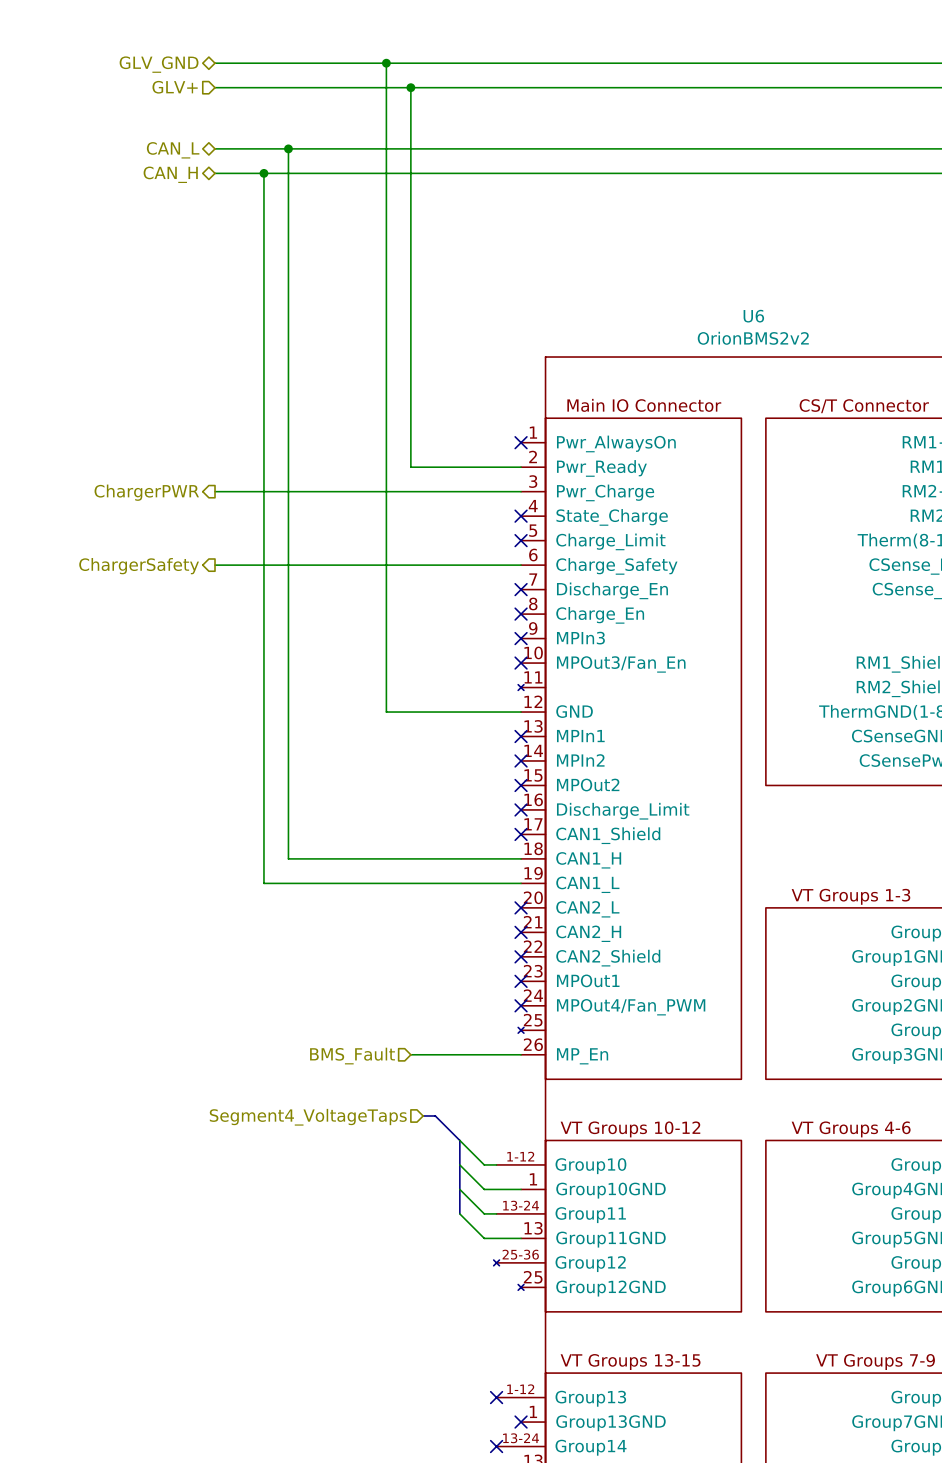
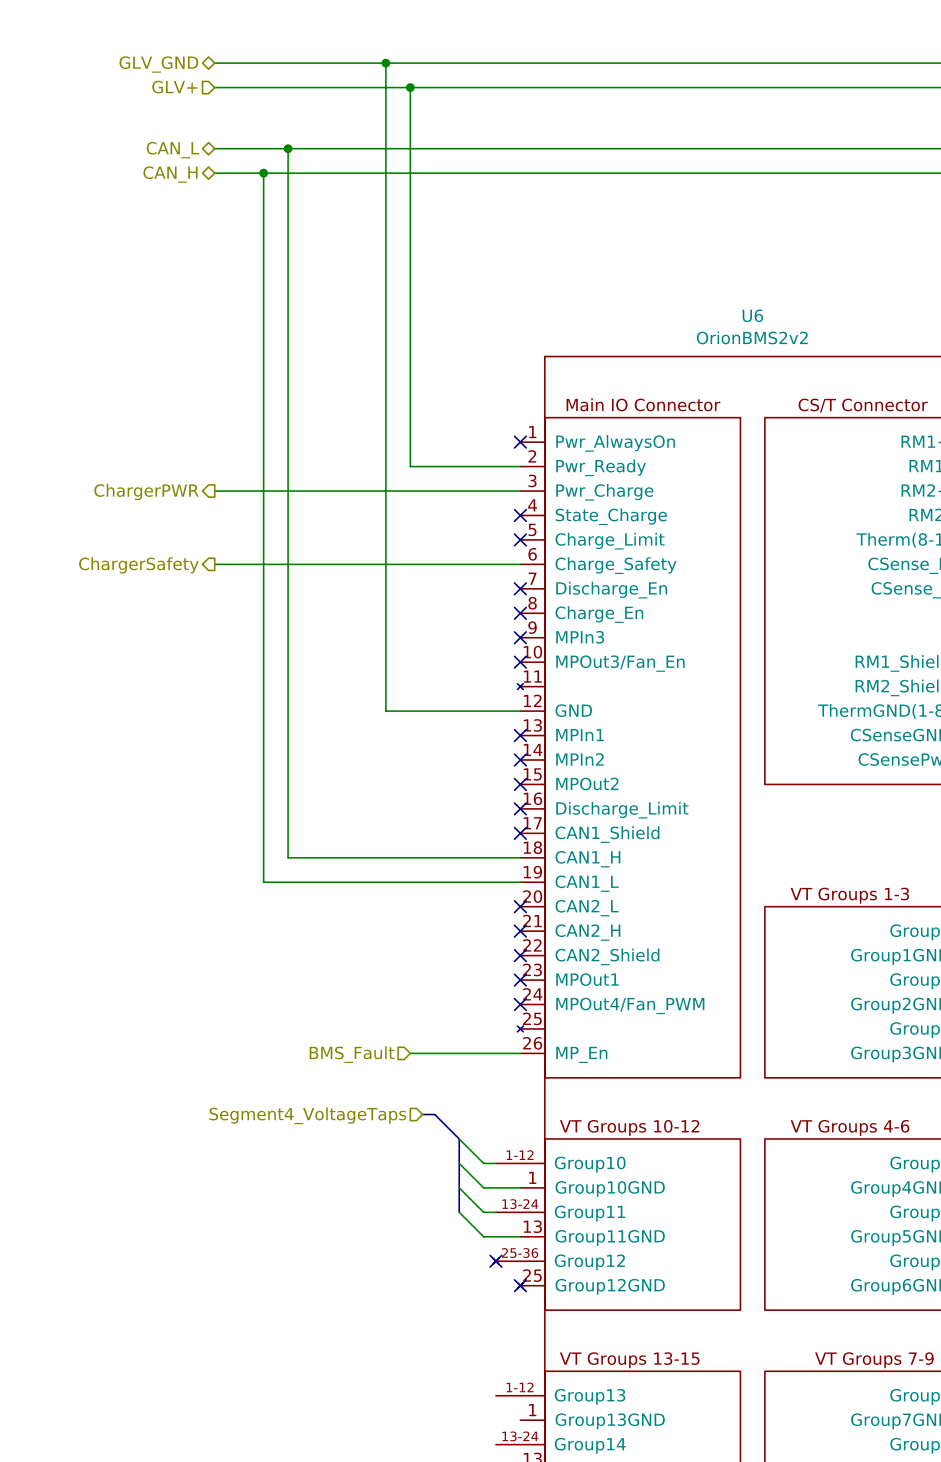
no-connect mark: none -> (495, 1261)
no-connect mark: none -> (520, 1285)
no-connect mark: (496, 1397) -> none
no-connect mark: (521, 1422) -> none
no-connect mark: (496, 1446) -> none

